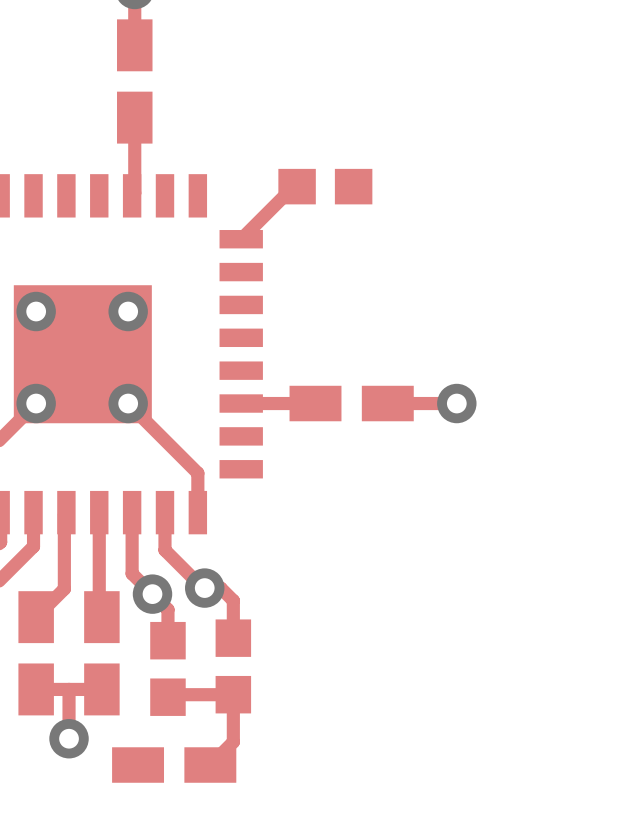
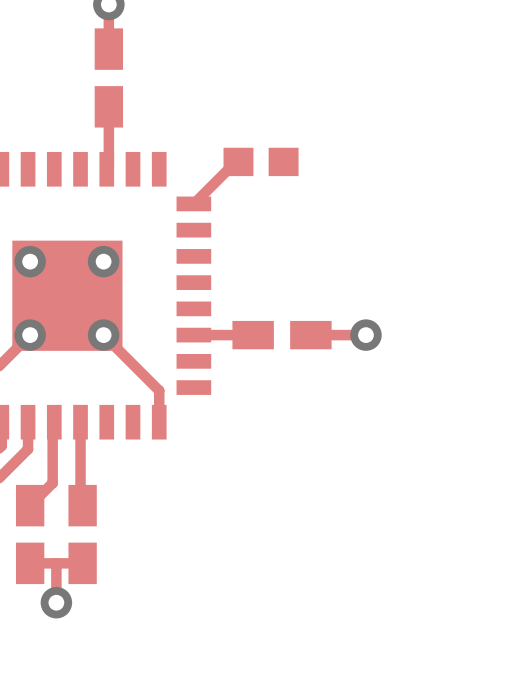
top track: (132, 512) (132, 573) (167, 609) (167, 640) -> none
top track: (164, 512) (164, 550) (204, 587) -> none
top track: (204, 588) (220, 588) (233, 600) (233, 638) -> none
via: (204, 588) -> none
via: (152, 594) -> none
part: (233, 666) -> none
part: (167, 668) -> none
top track: (167, 697) (170, 694) (233, 694) (233, 742) (210, 765) -> none
part: (174, 765) -> none

